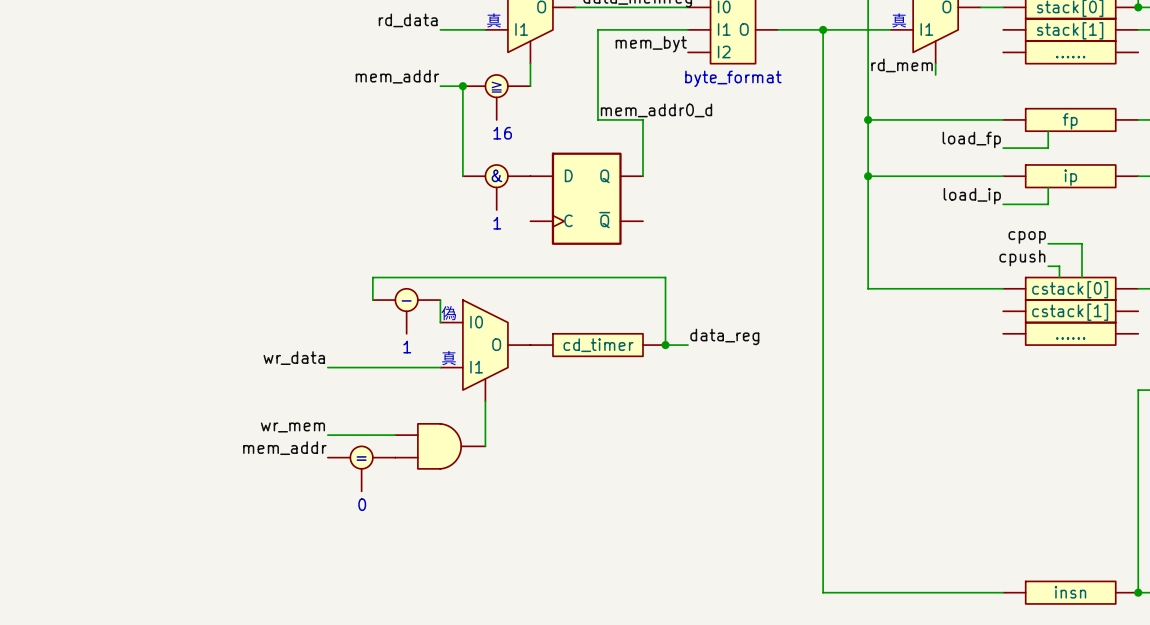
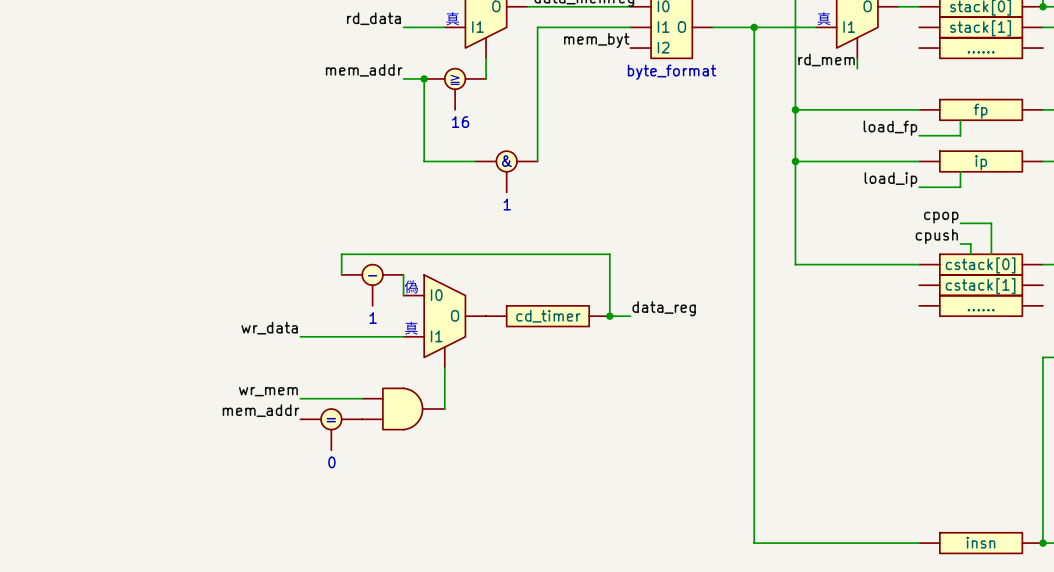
wire: (597, 29) (597, 119) (643, 119) (643, 176) -> (547, 27) (537, 27) (537, 161)
label: mem_addr0_d (656, 110) -> none
text position: & (496, 175) -> & (506, 161)
part position: (496, 187) -> (506, 171)
part: (586, 198) -> none
text position: 1 (497, 223) -> 1 (507, 204)

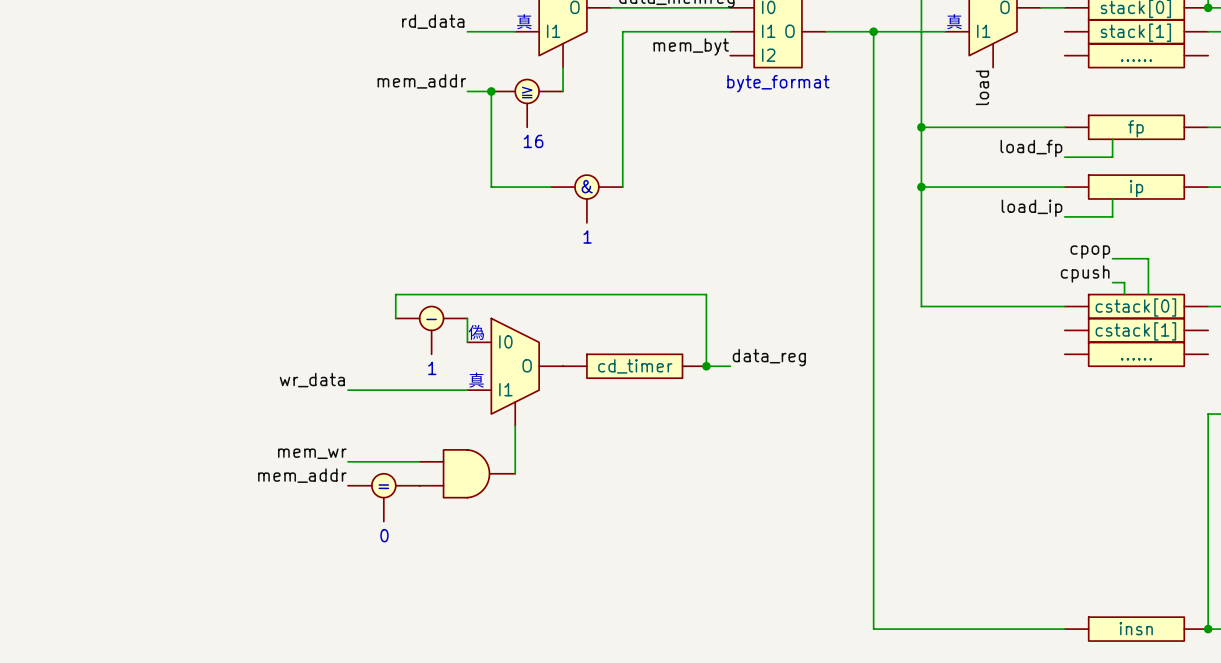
wire: (857, 58) (857, 68) -> none
label: rd_mem (826, 59) -> load (982, 87)
label: wr_mem (268, 391) -> mem_wr (312, 453)

